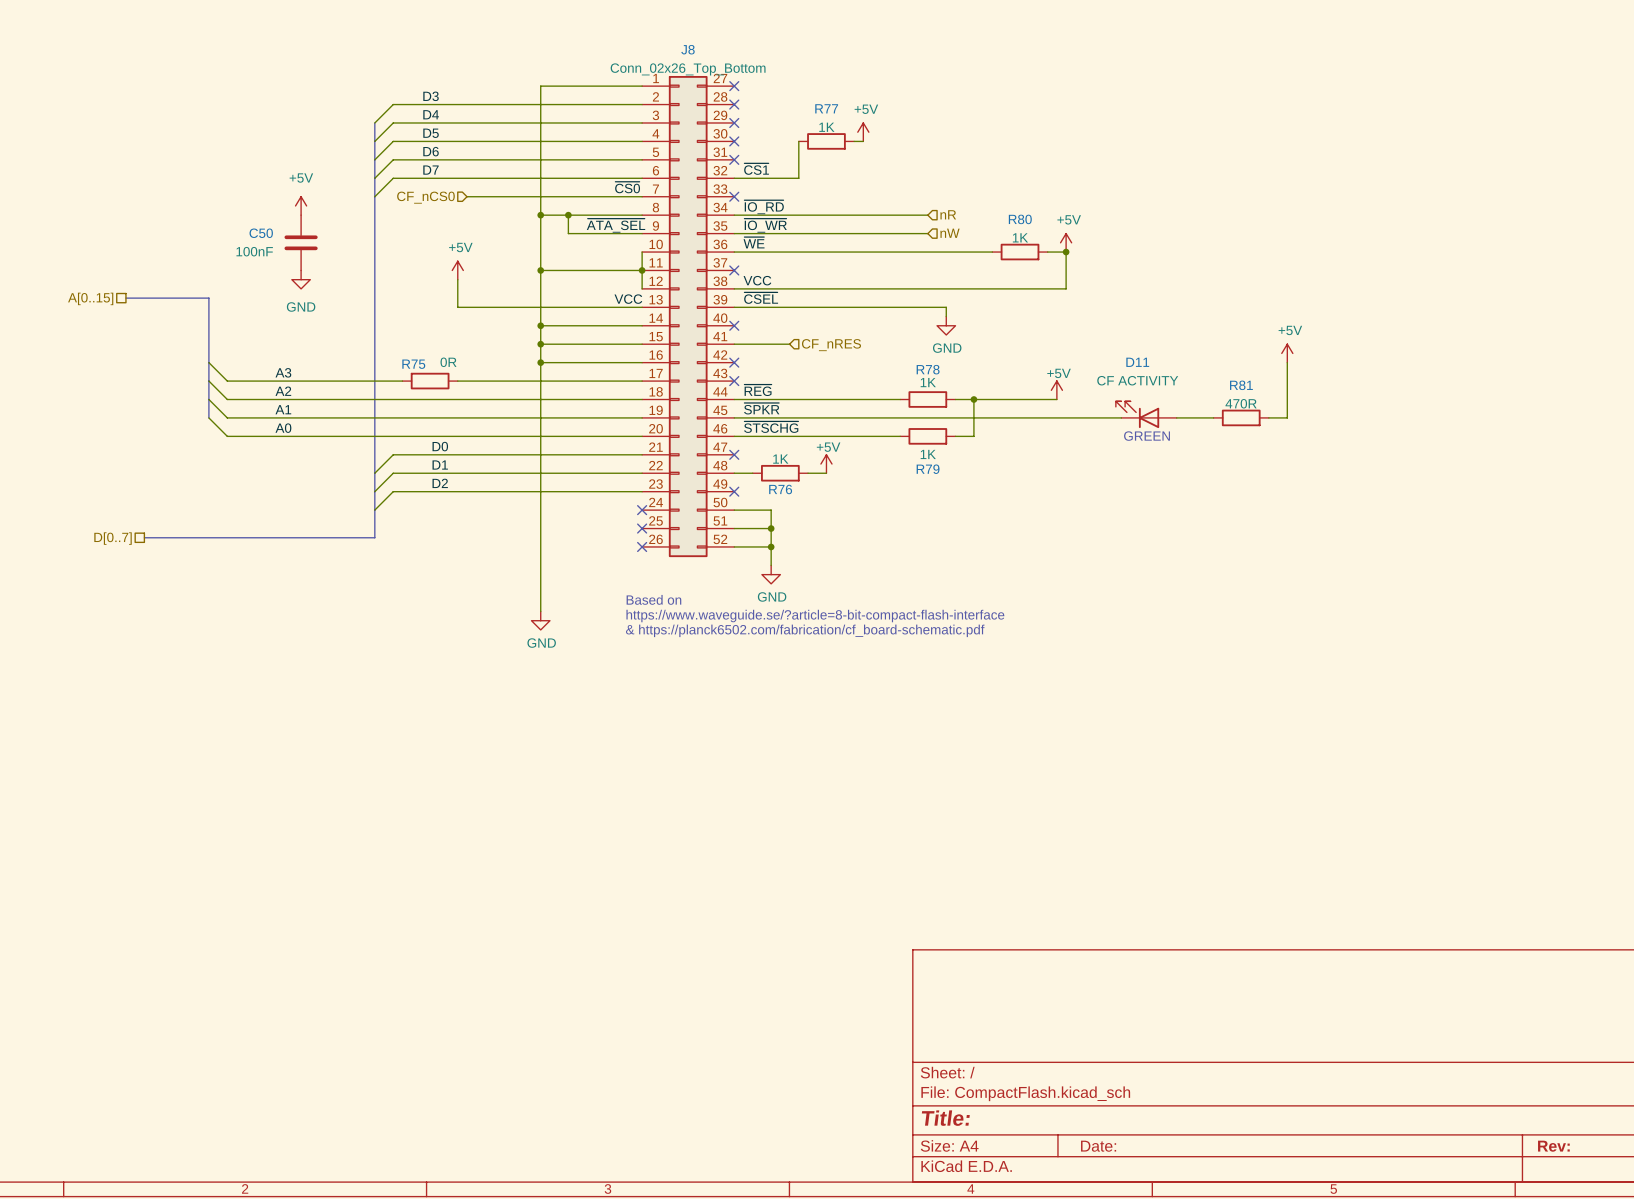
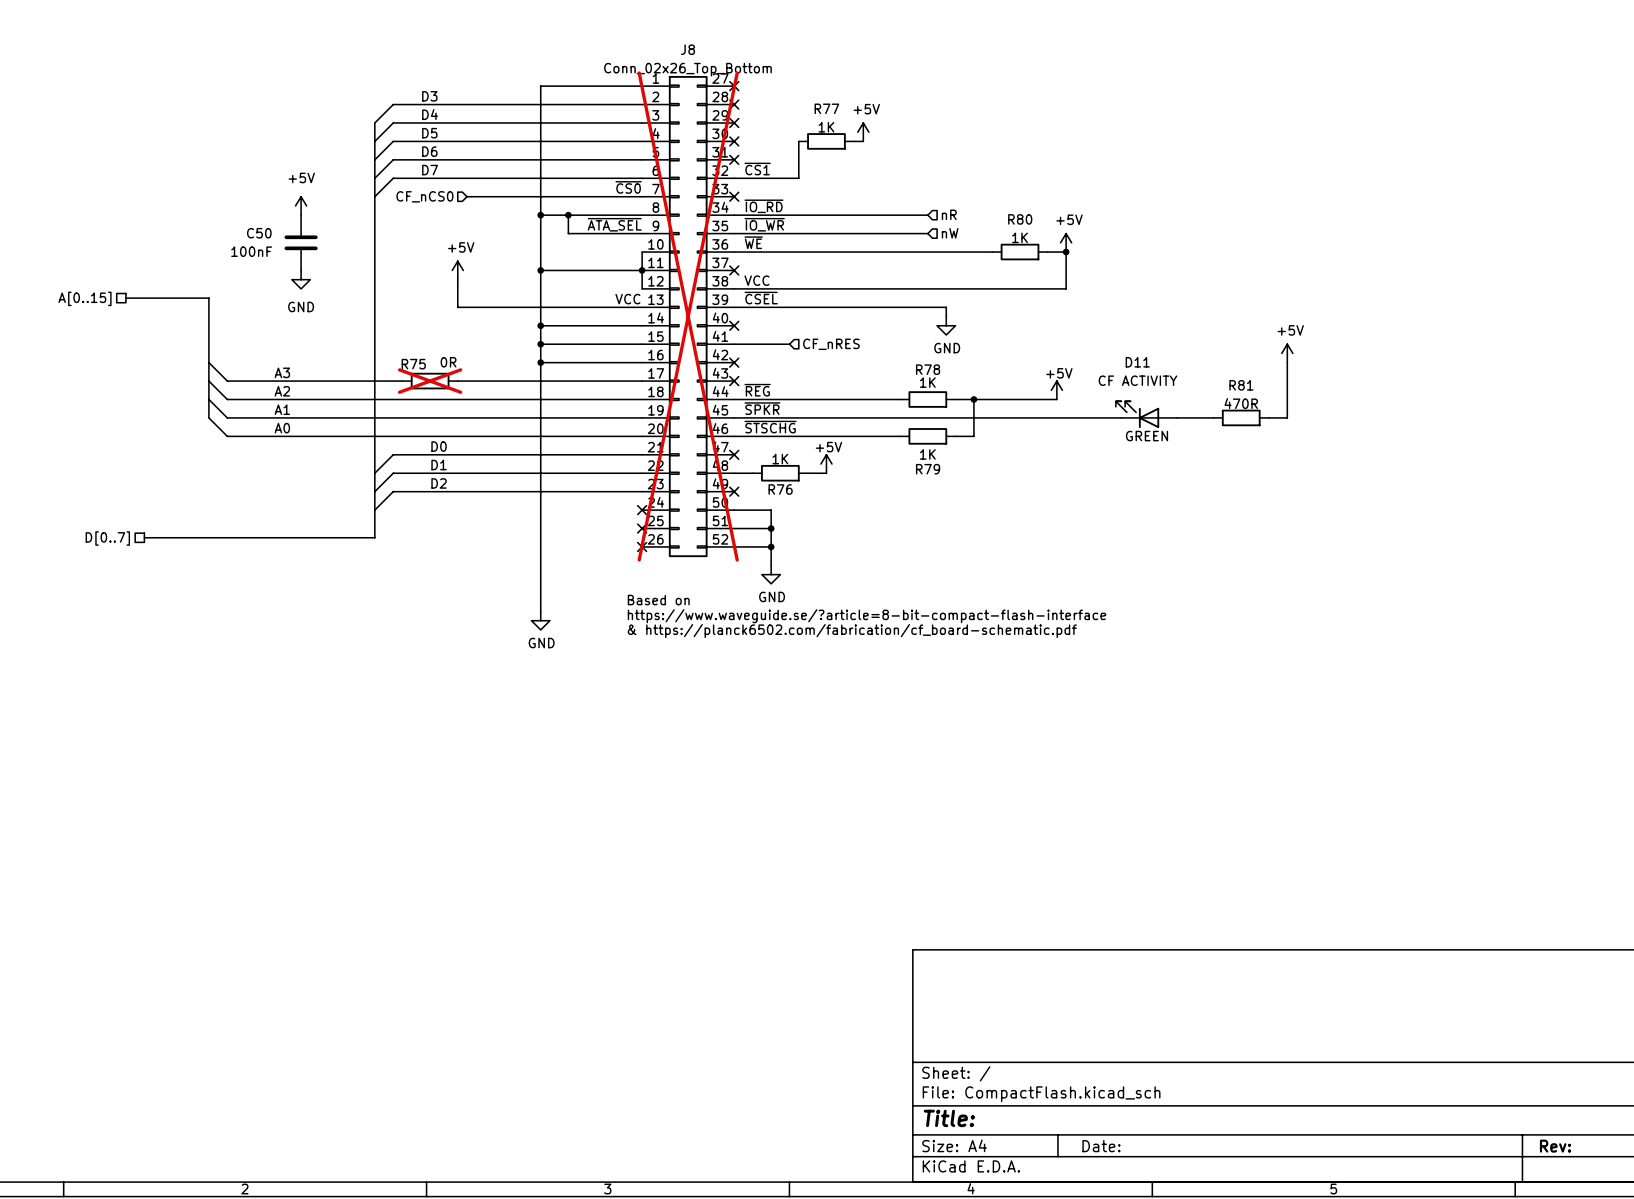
J8 do-not-place cross: none -> (688, 316)
R75 do-not-place cross: none -> (430, 381)

